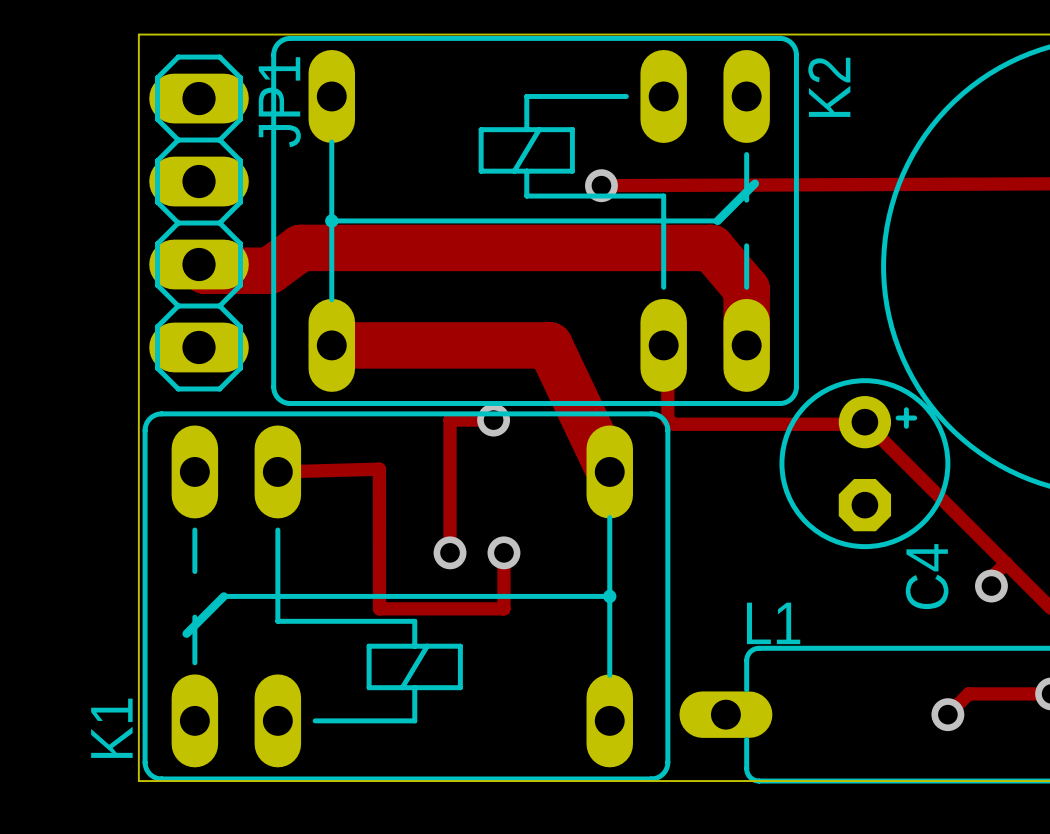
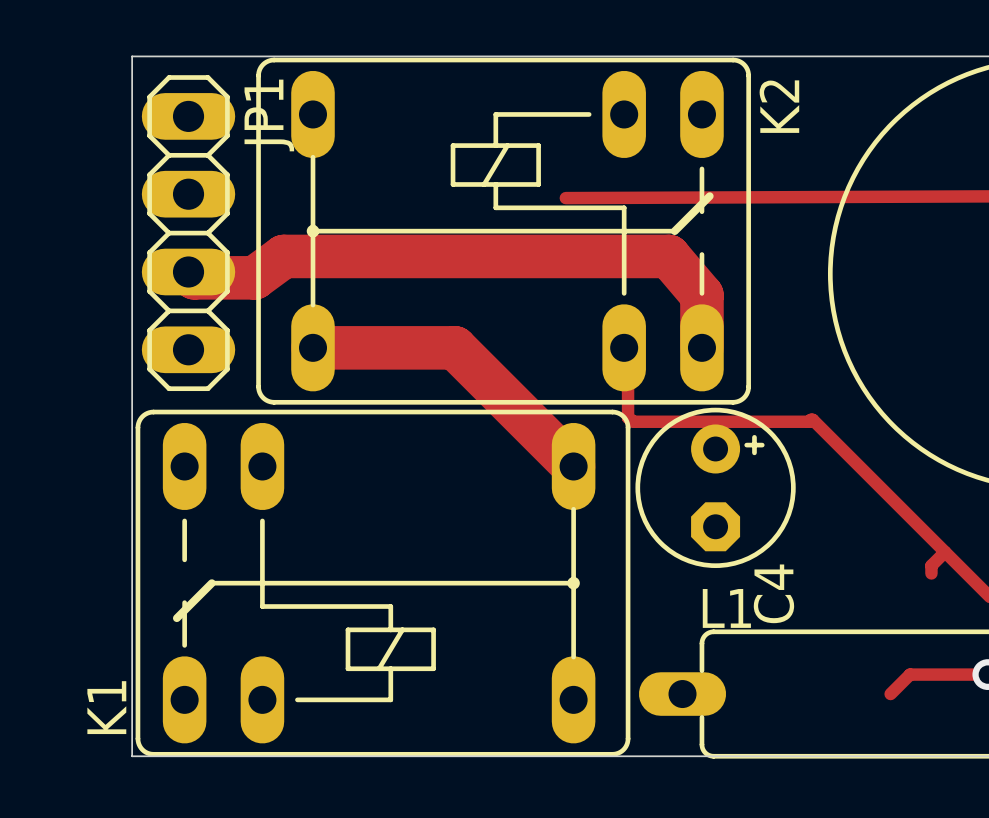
via: (601, 185) -> none
track: (483, 345) (549, 345) (609, 471) -> (454, 347) (573, 466)
track: (493, 420) (450, 420) (450, 552) -> none
via: (493, 420) -> none
C4 position: (864, 463) -> (715, 487)
track: (277, 471) (379, 469) (379, 608) (503, 608) (503, 552) -> none
via: (450, 552) -> none
via: (503, 552) -> none
via: (991, 586) -> none
via: (947, 714) -> none

